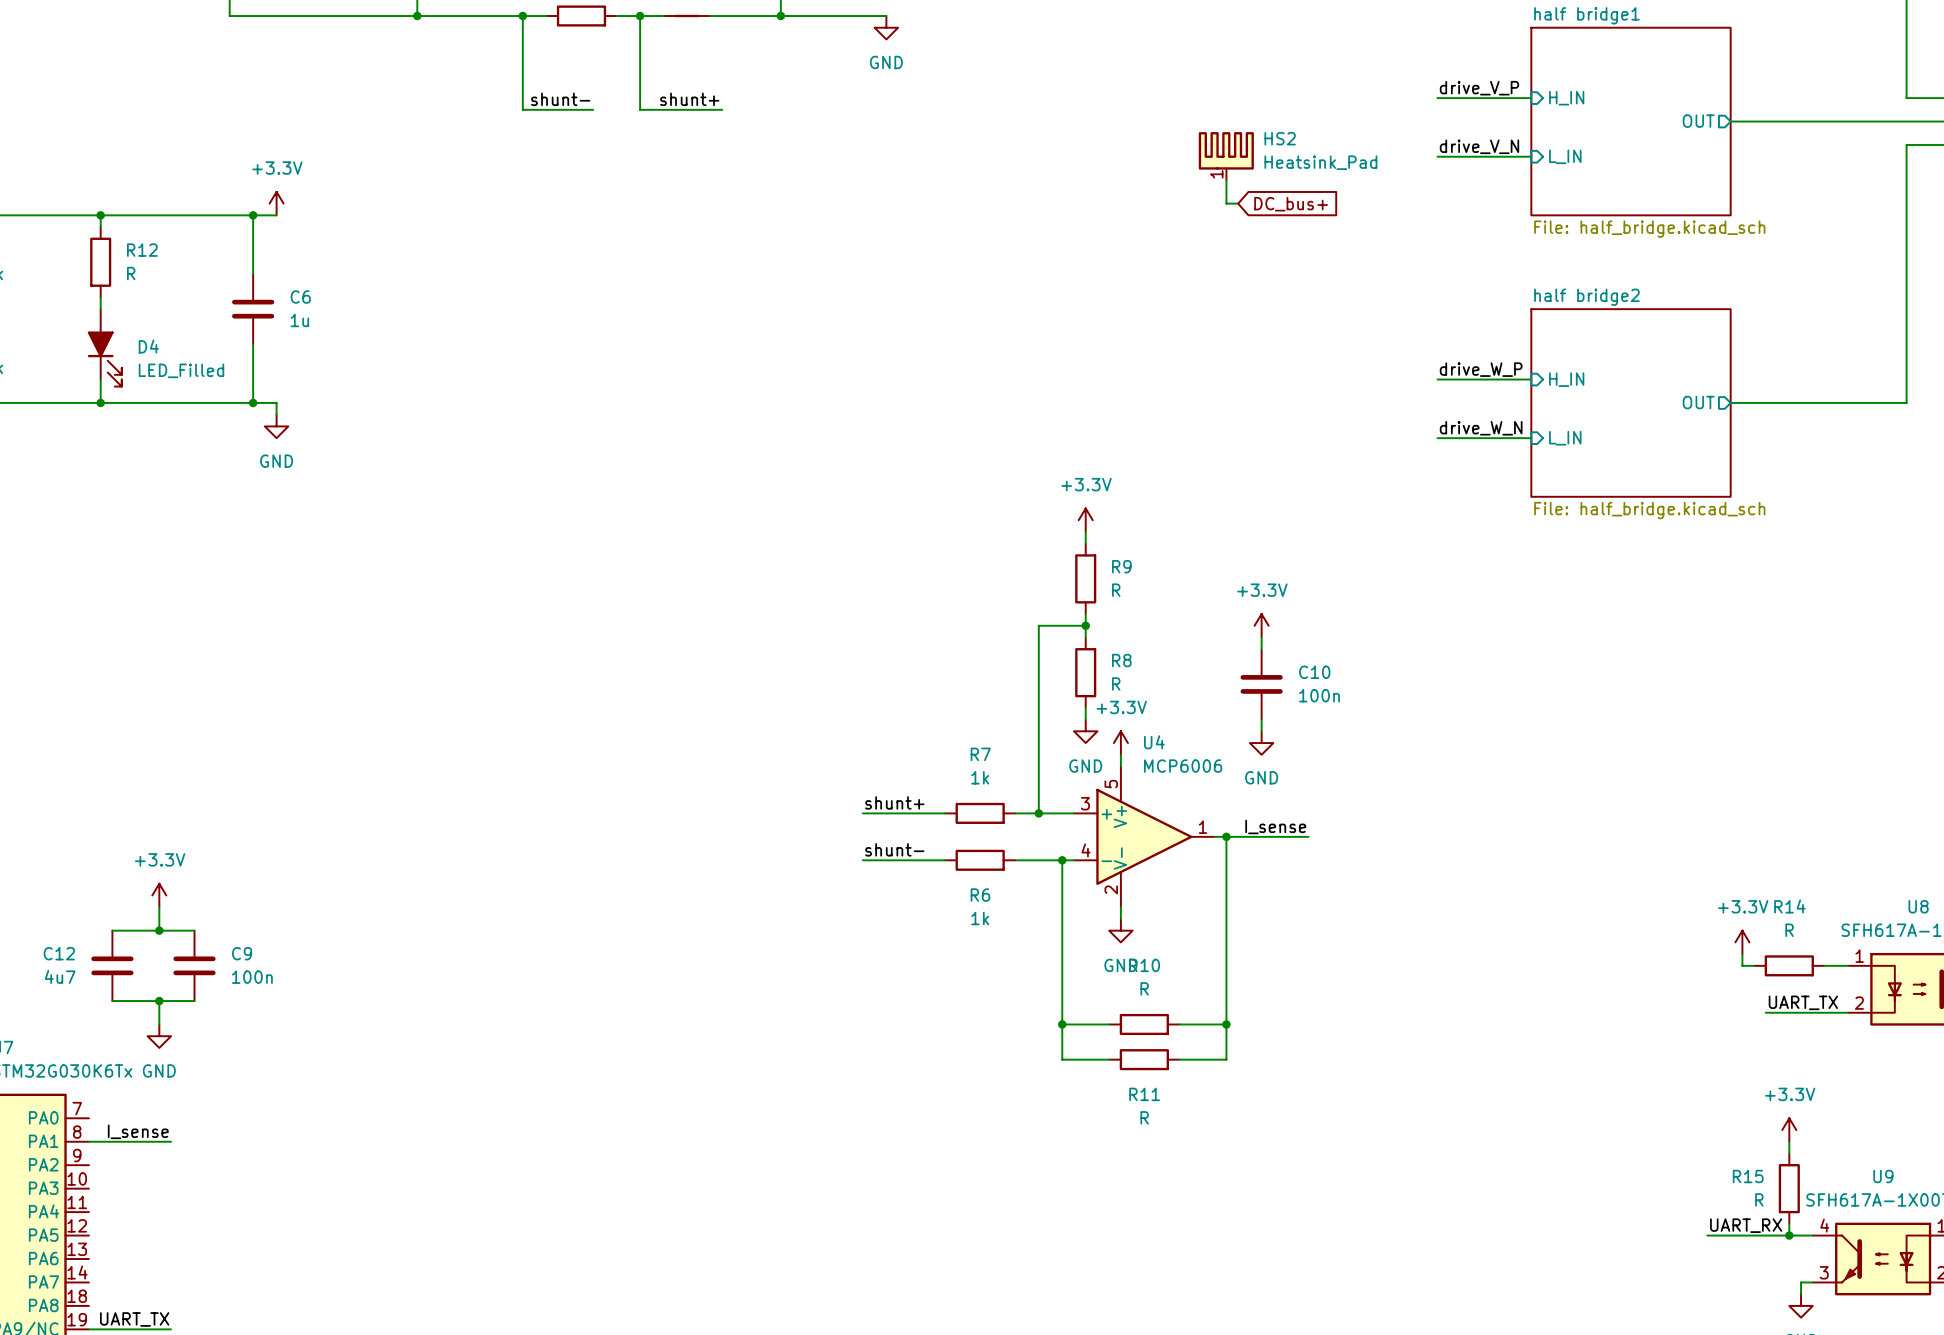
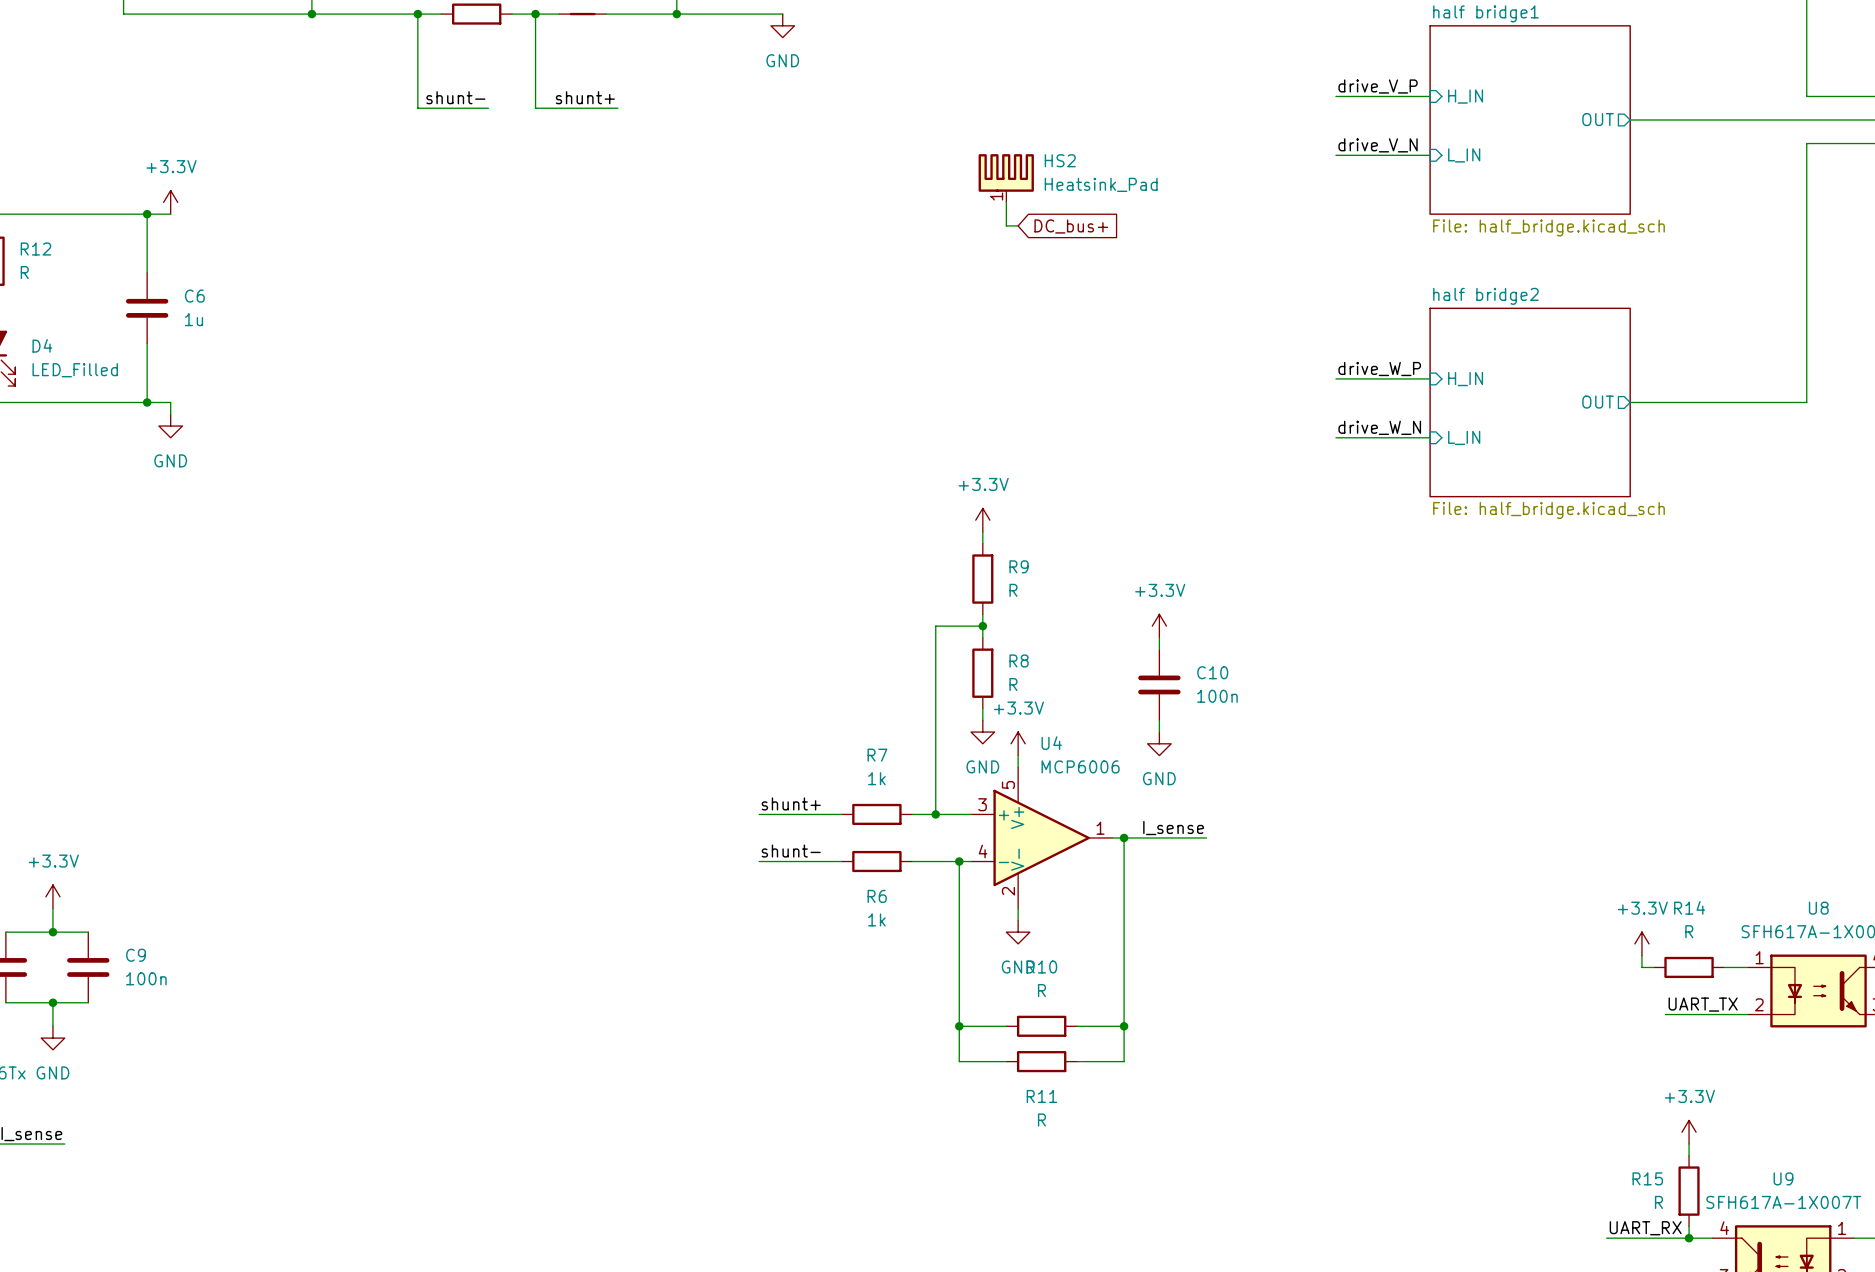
HS2 position: (1226, 156) -> (1006, 178)
wire: (1226, 180) (1226, 203) (1238, 203) -> (1006, 202) (1006, 225) (1018, 225)
global label position: DC_bus+ (1291, 204) -> DC_bus+ (1071, 226)

